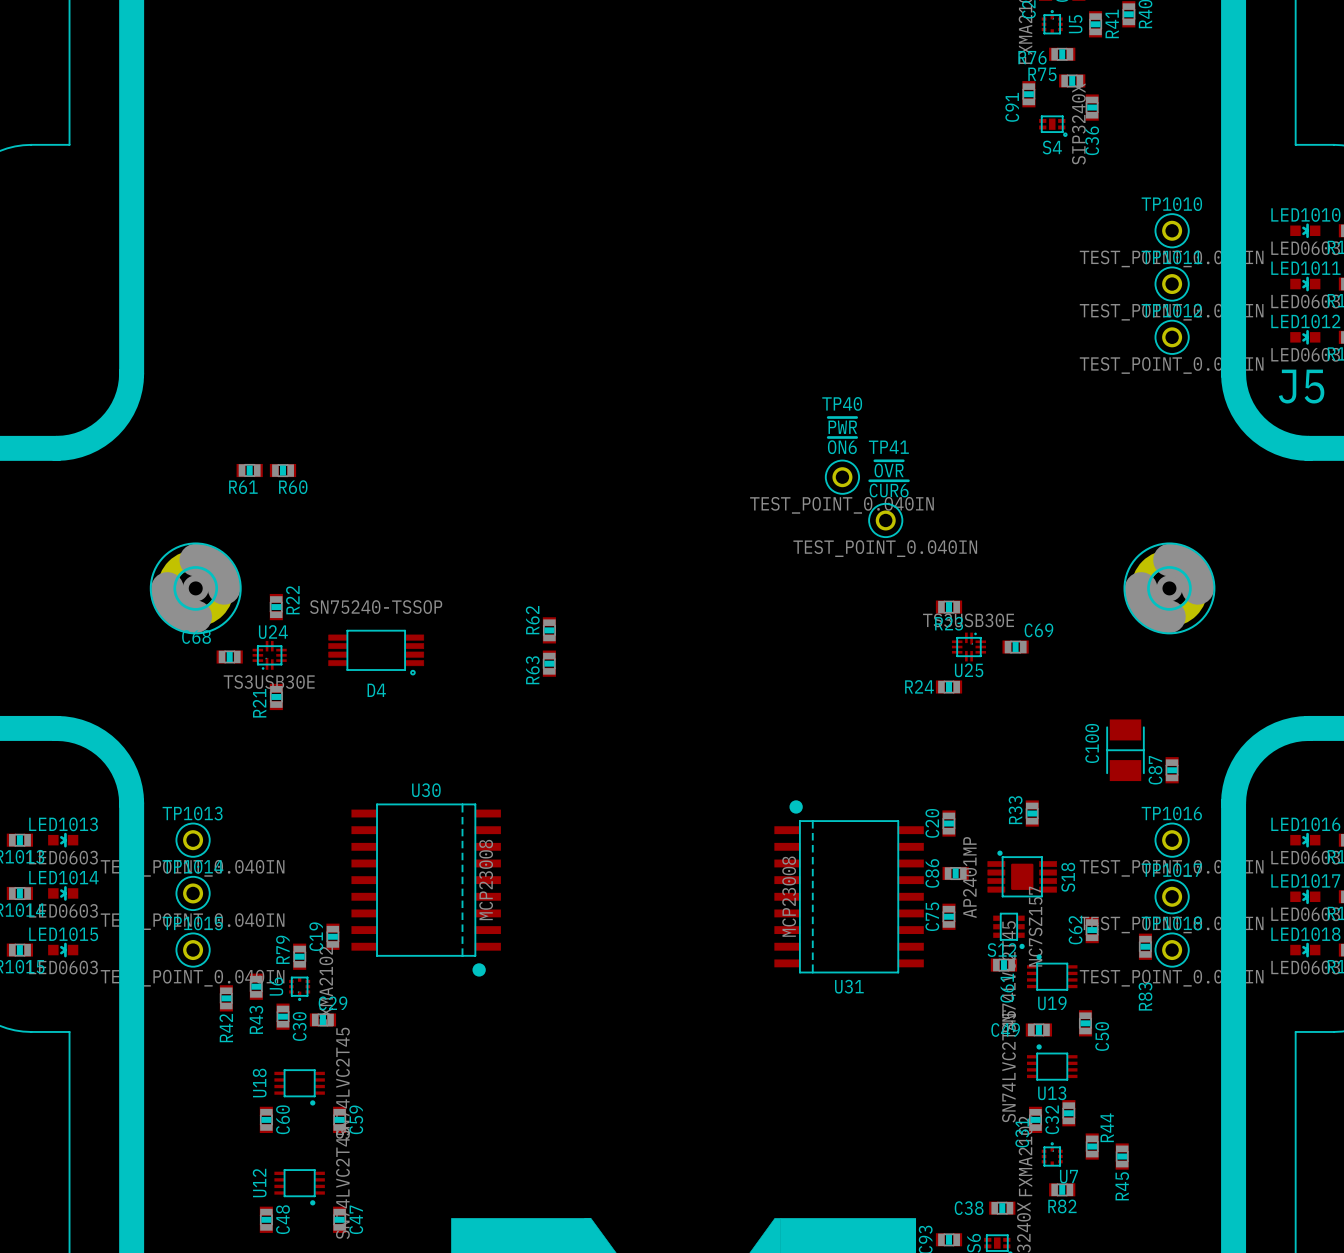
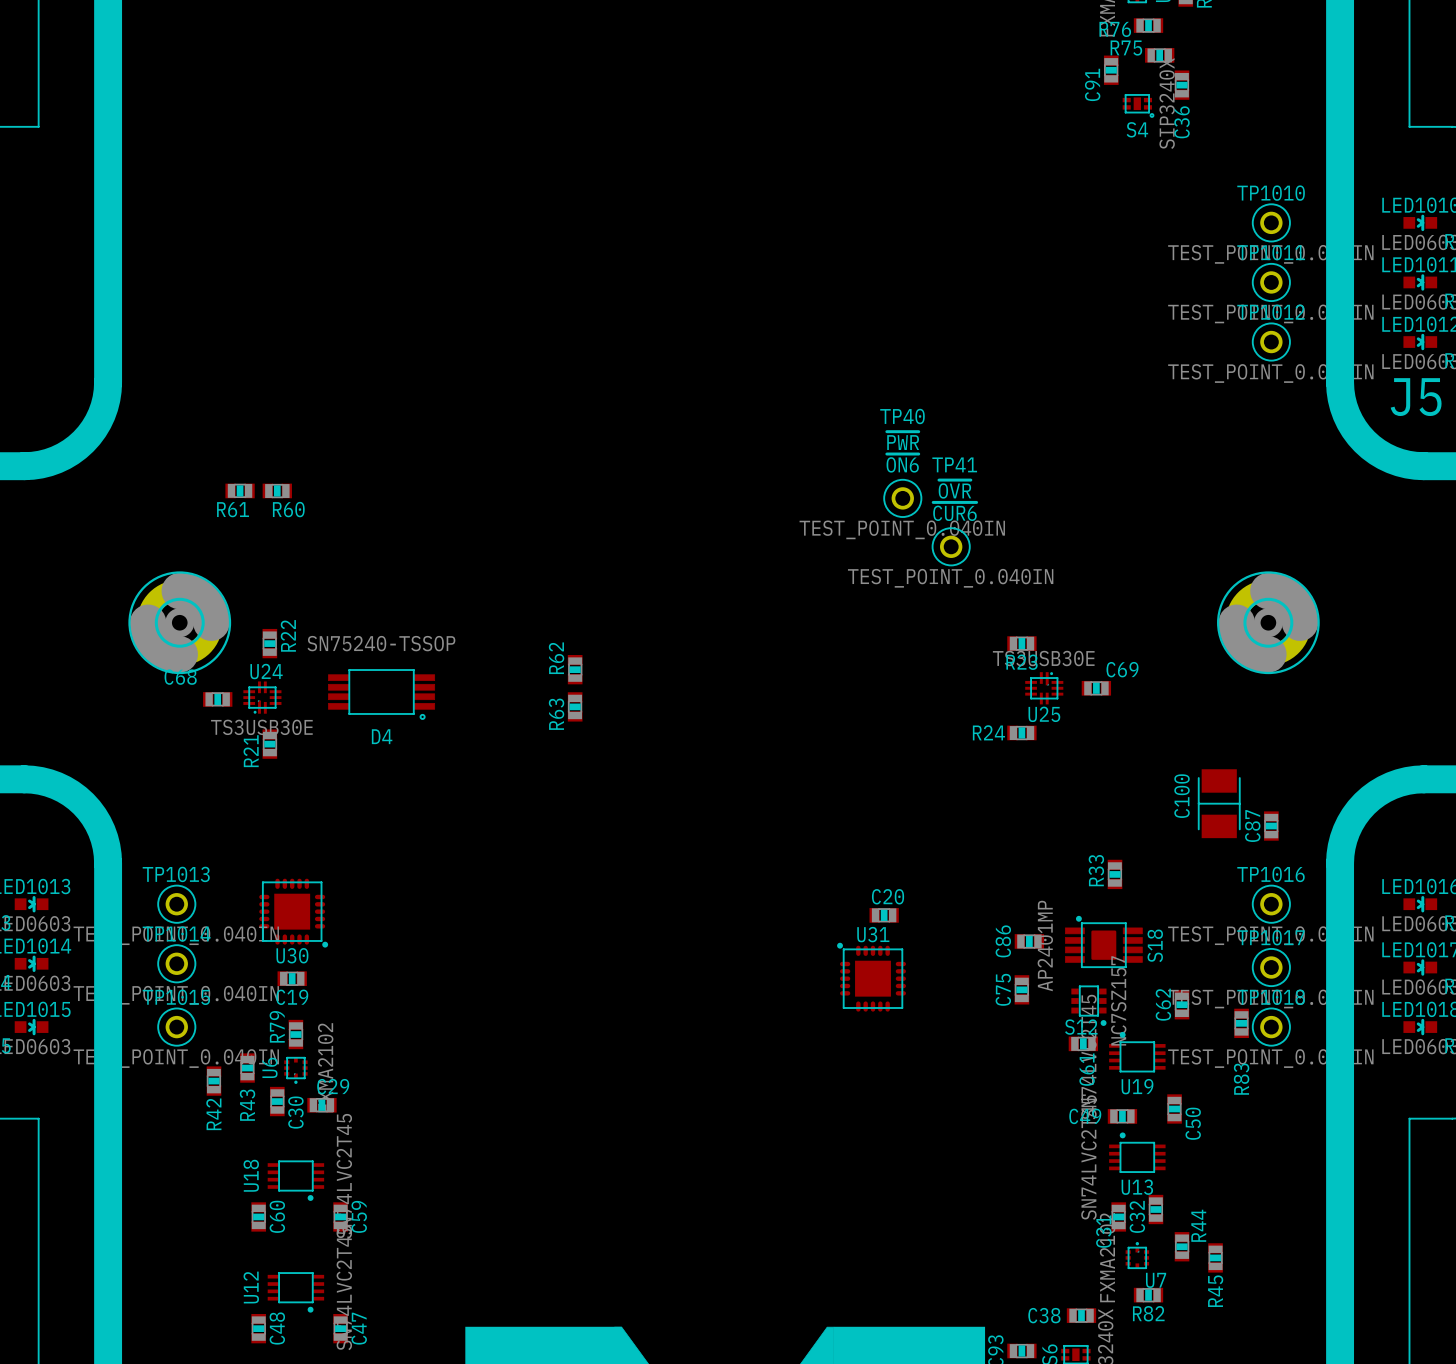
U30 name position: U30 (426, 790) -> U30 (292, 955)
U31 footprint: [774, 800, 924, 974] -> [837, 942, 906, 1012]
U30 footprint: [351, 803, 501, 977] -> [259, 878, 329, 948]
C20 rotation: 0° (949, 823) -> 90° clockwise (884, 915)
C20 position: (949, 823) -> (884, 915)
U30 value: MCP23008 (486, 880) -> none
U31 value: MCP23008 (789, 896) -> none
C19 rotation: 0° (332, 936) -> 90° clockwise (292, 978)
C19 position: (332, 936) -> (292, 978)
U31 name position: U31 (849, 986) -> U31 (873, 934)

